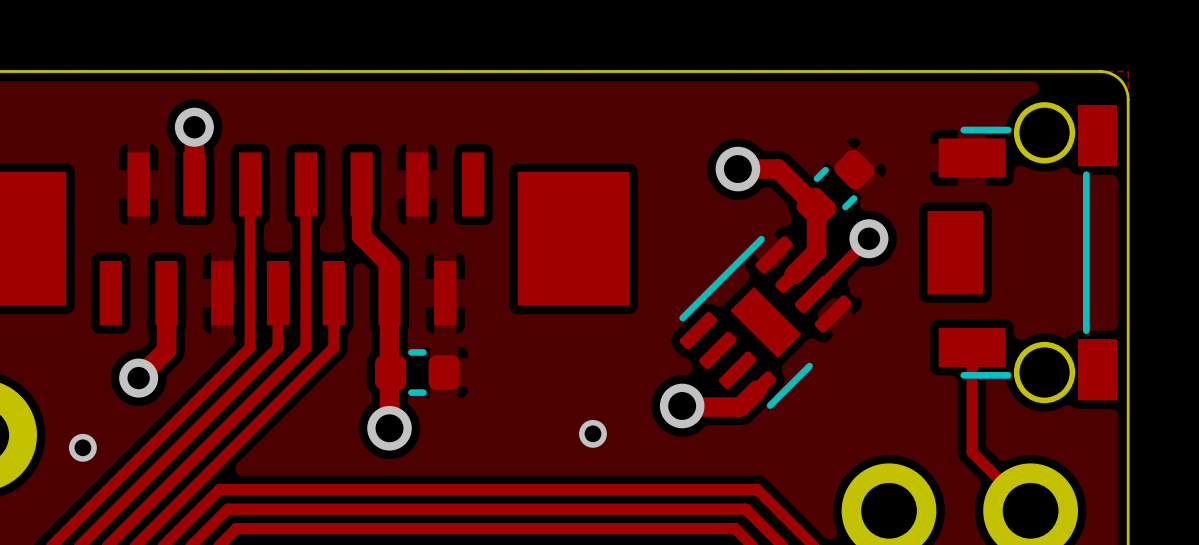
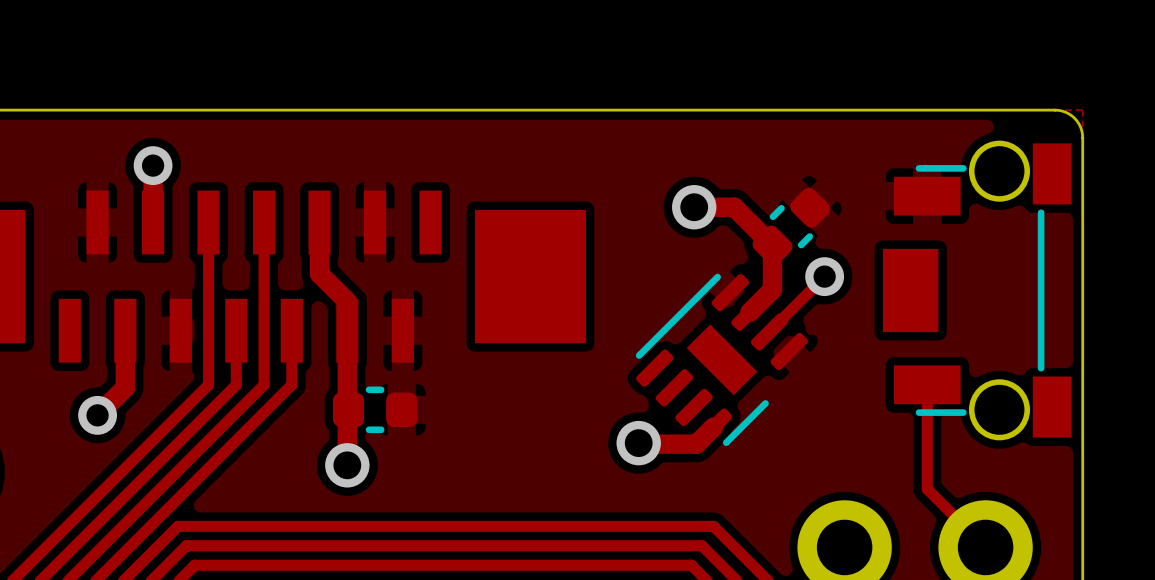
via: (592, 433) -> none
via: (82, 447) -> none

